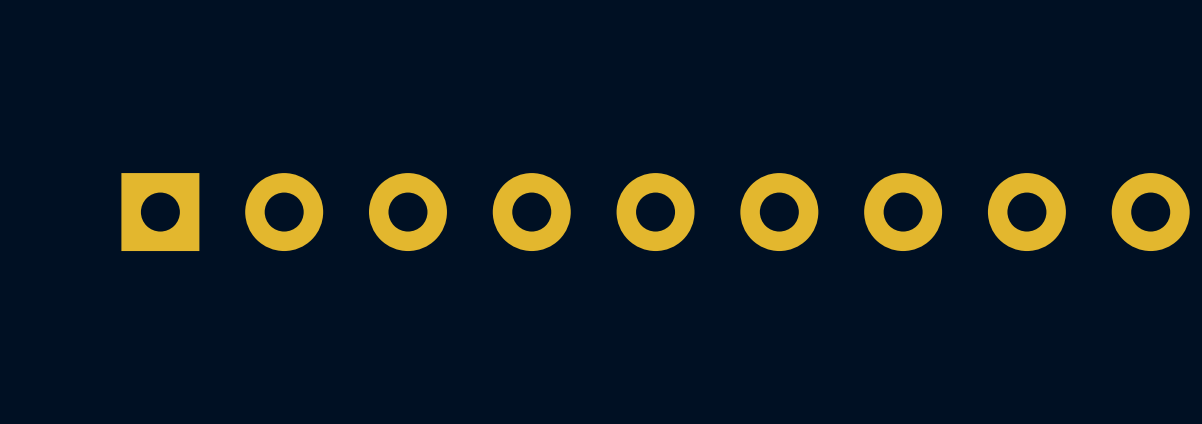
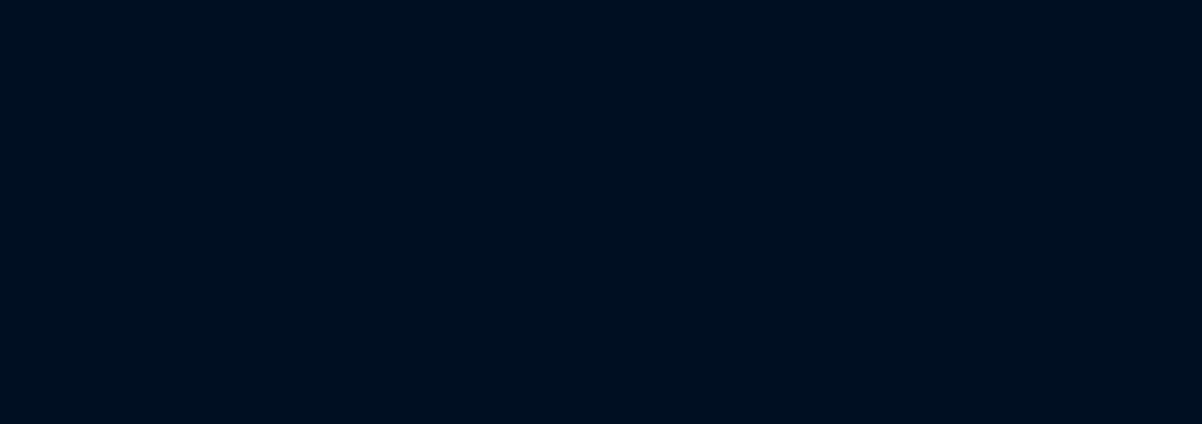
part: (655, 212) -> none

